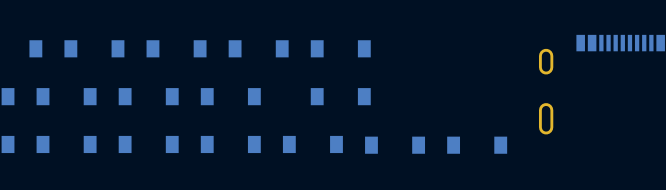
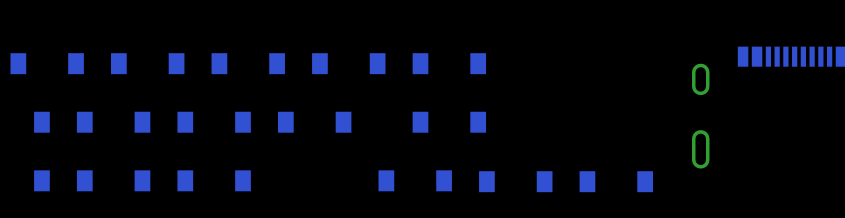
part: (230, 144) -> none

